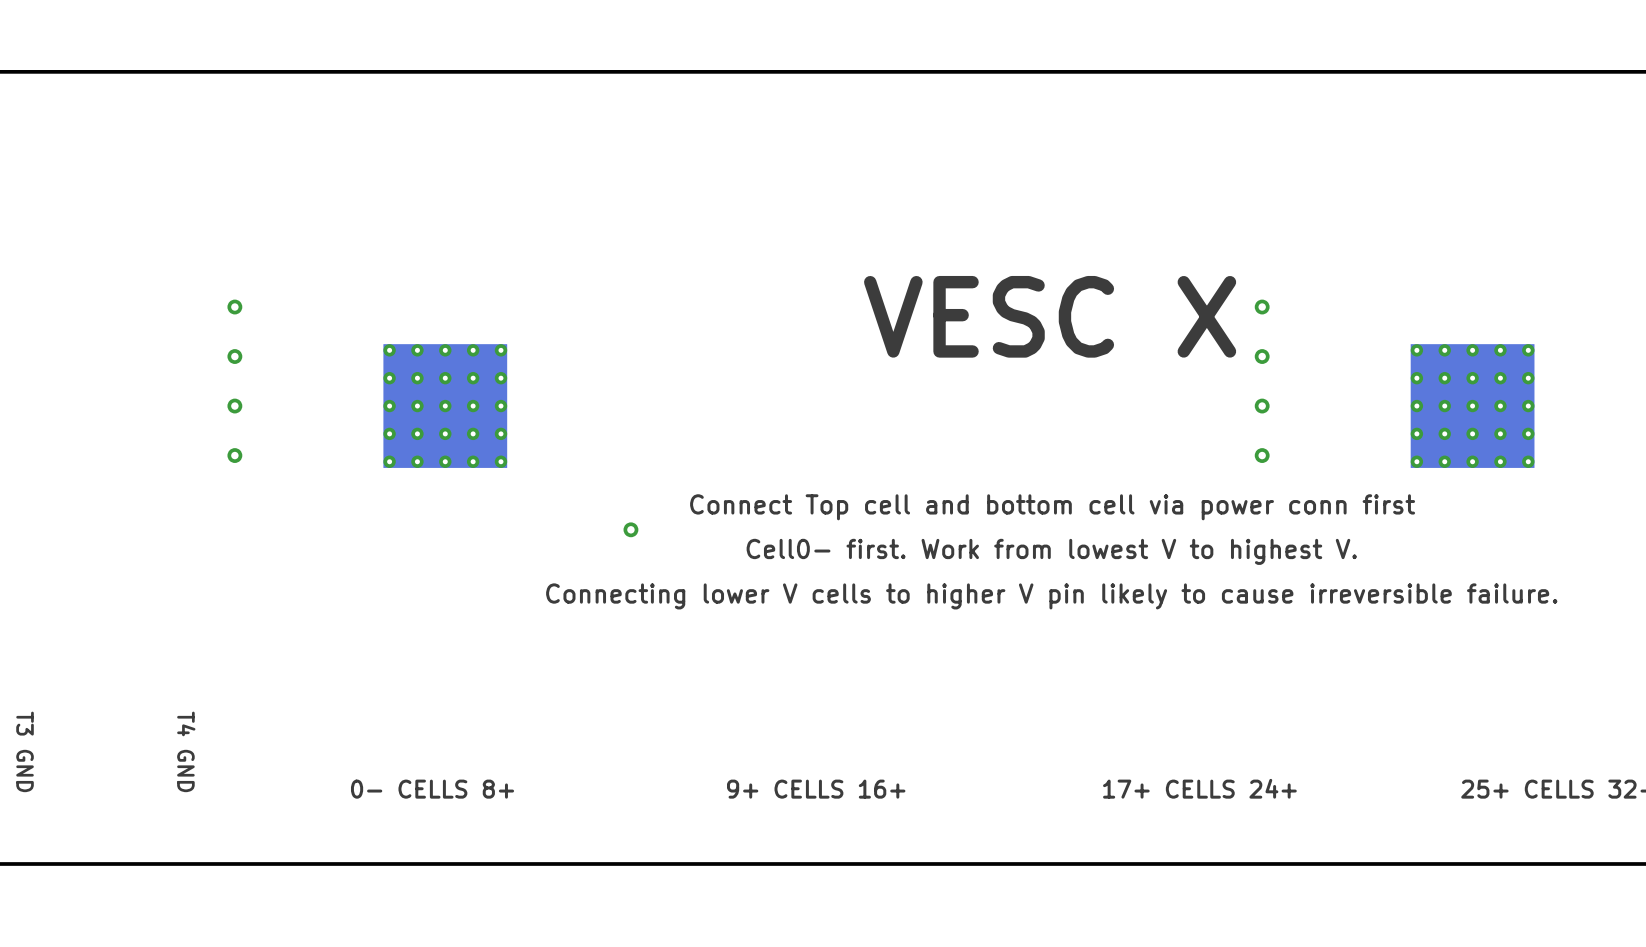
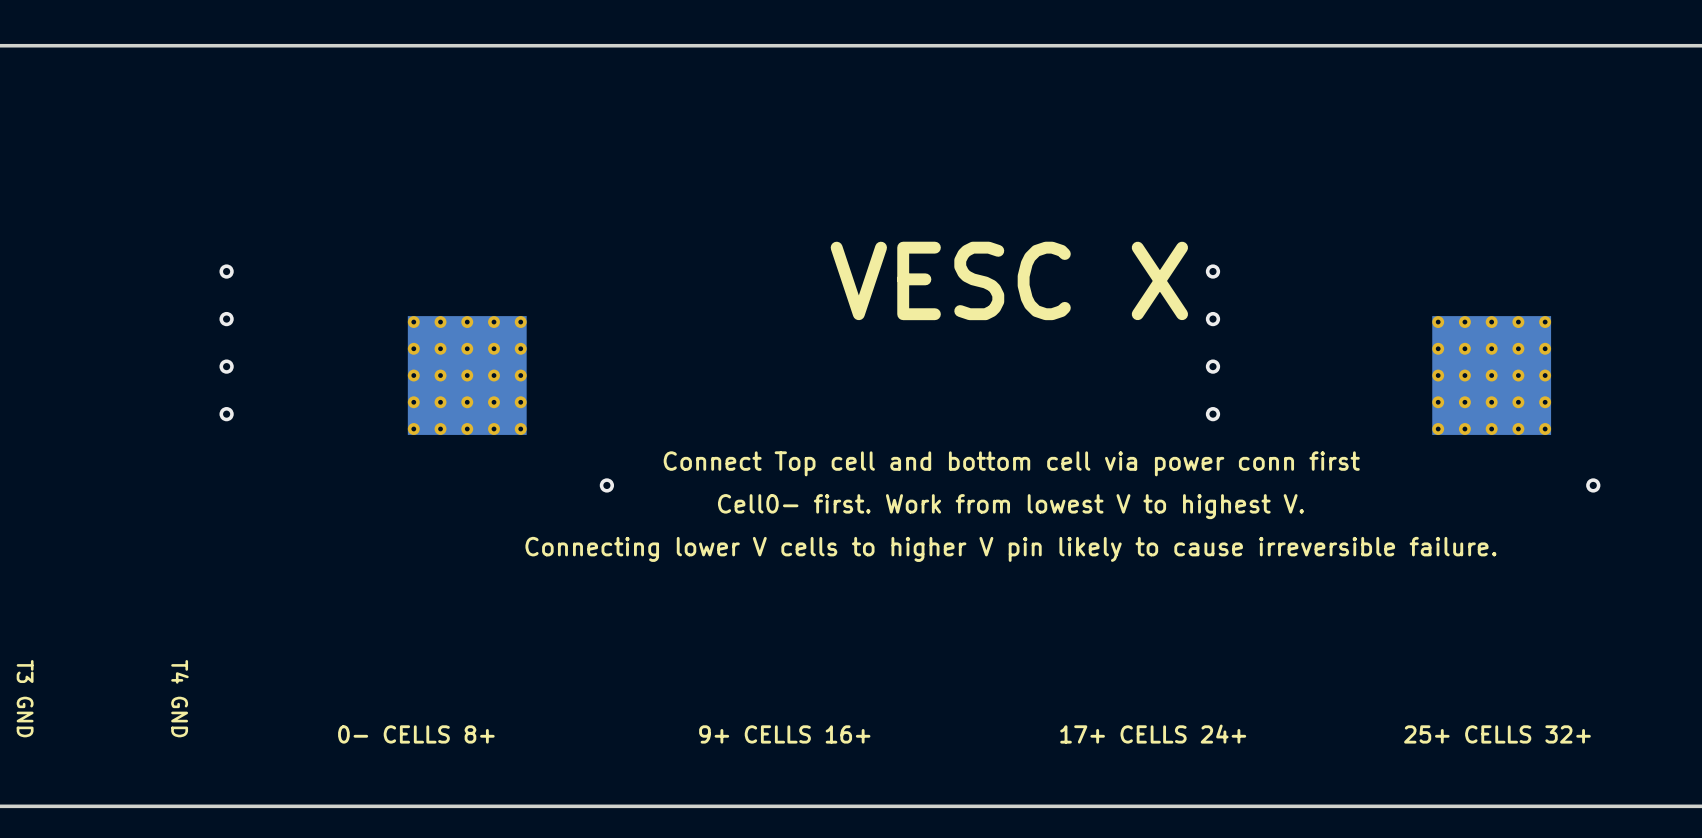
part position: (445, 406) -> (467, 375)
part position: (1472, 406) -> (1491, 375)

